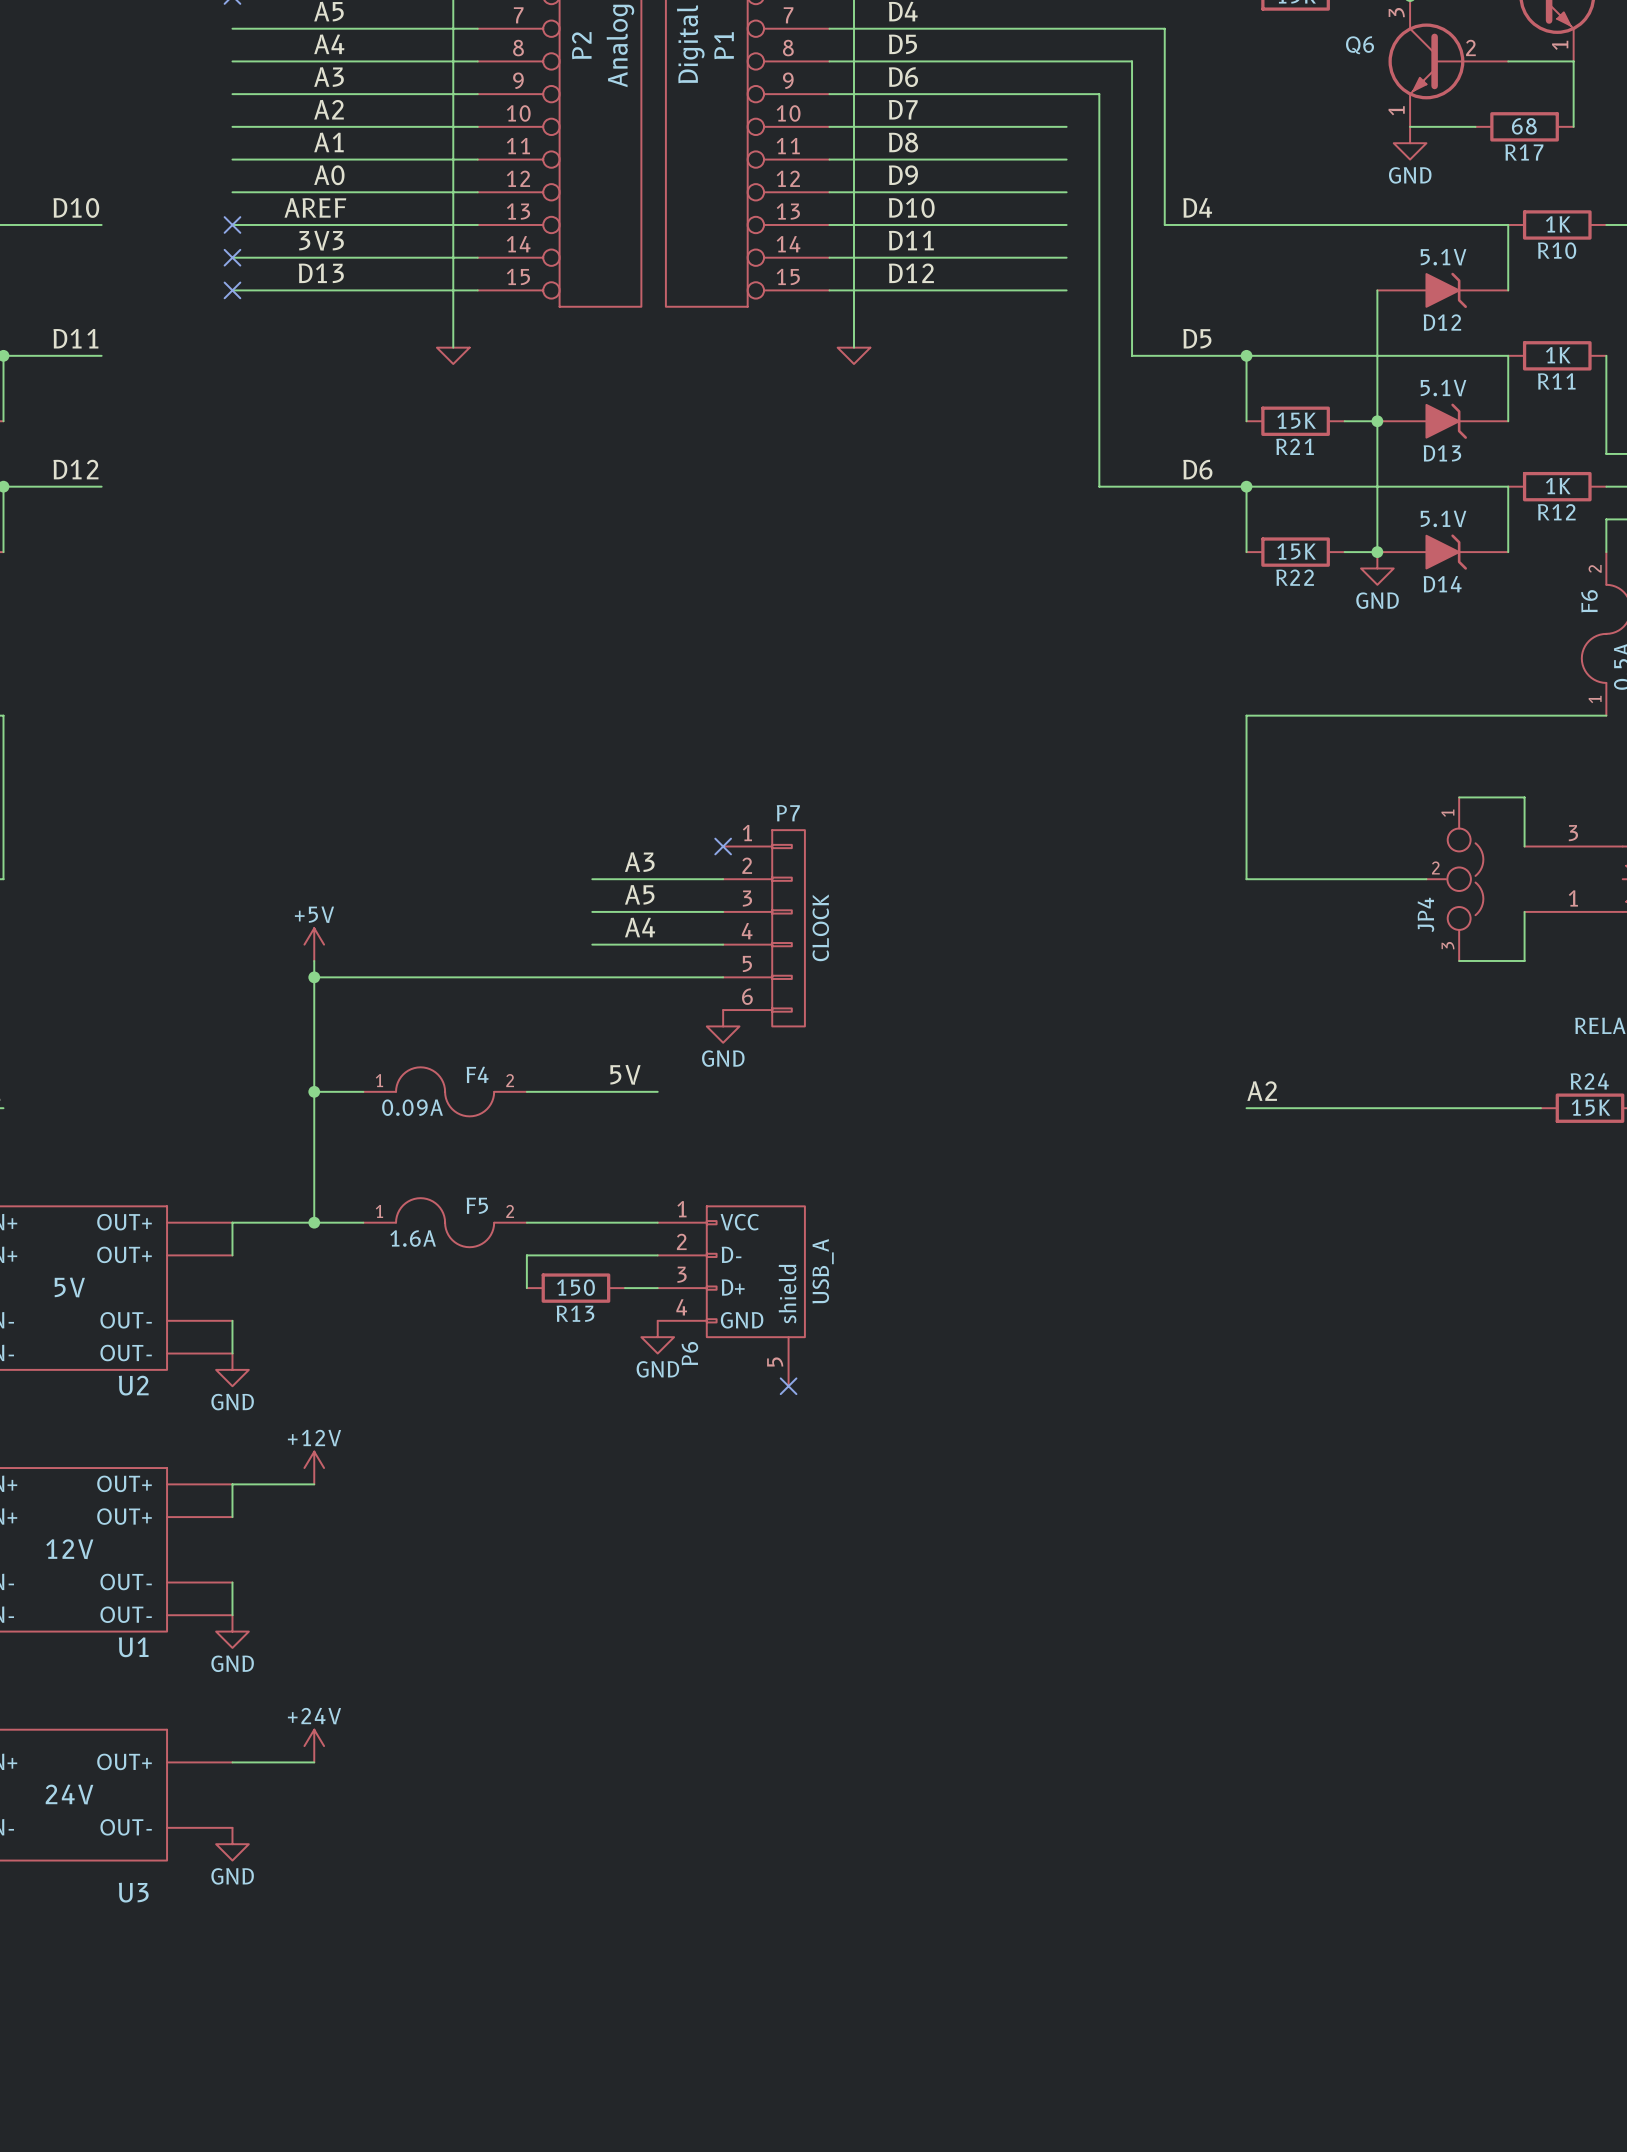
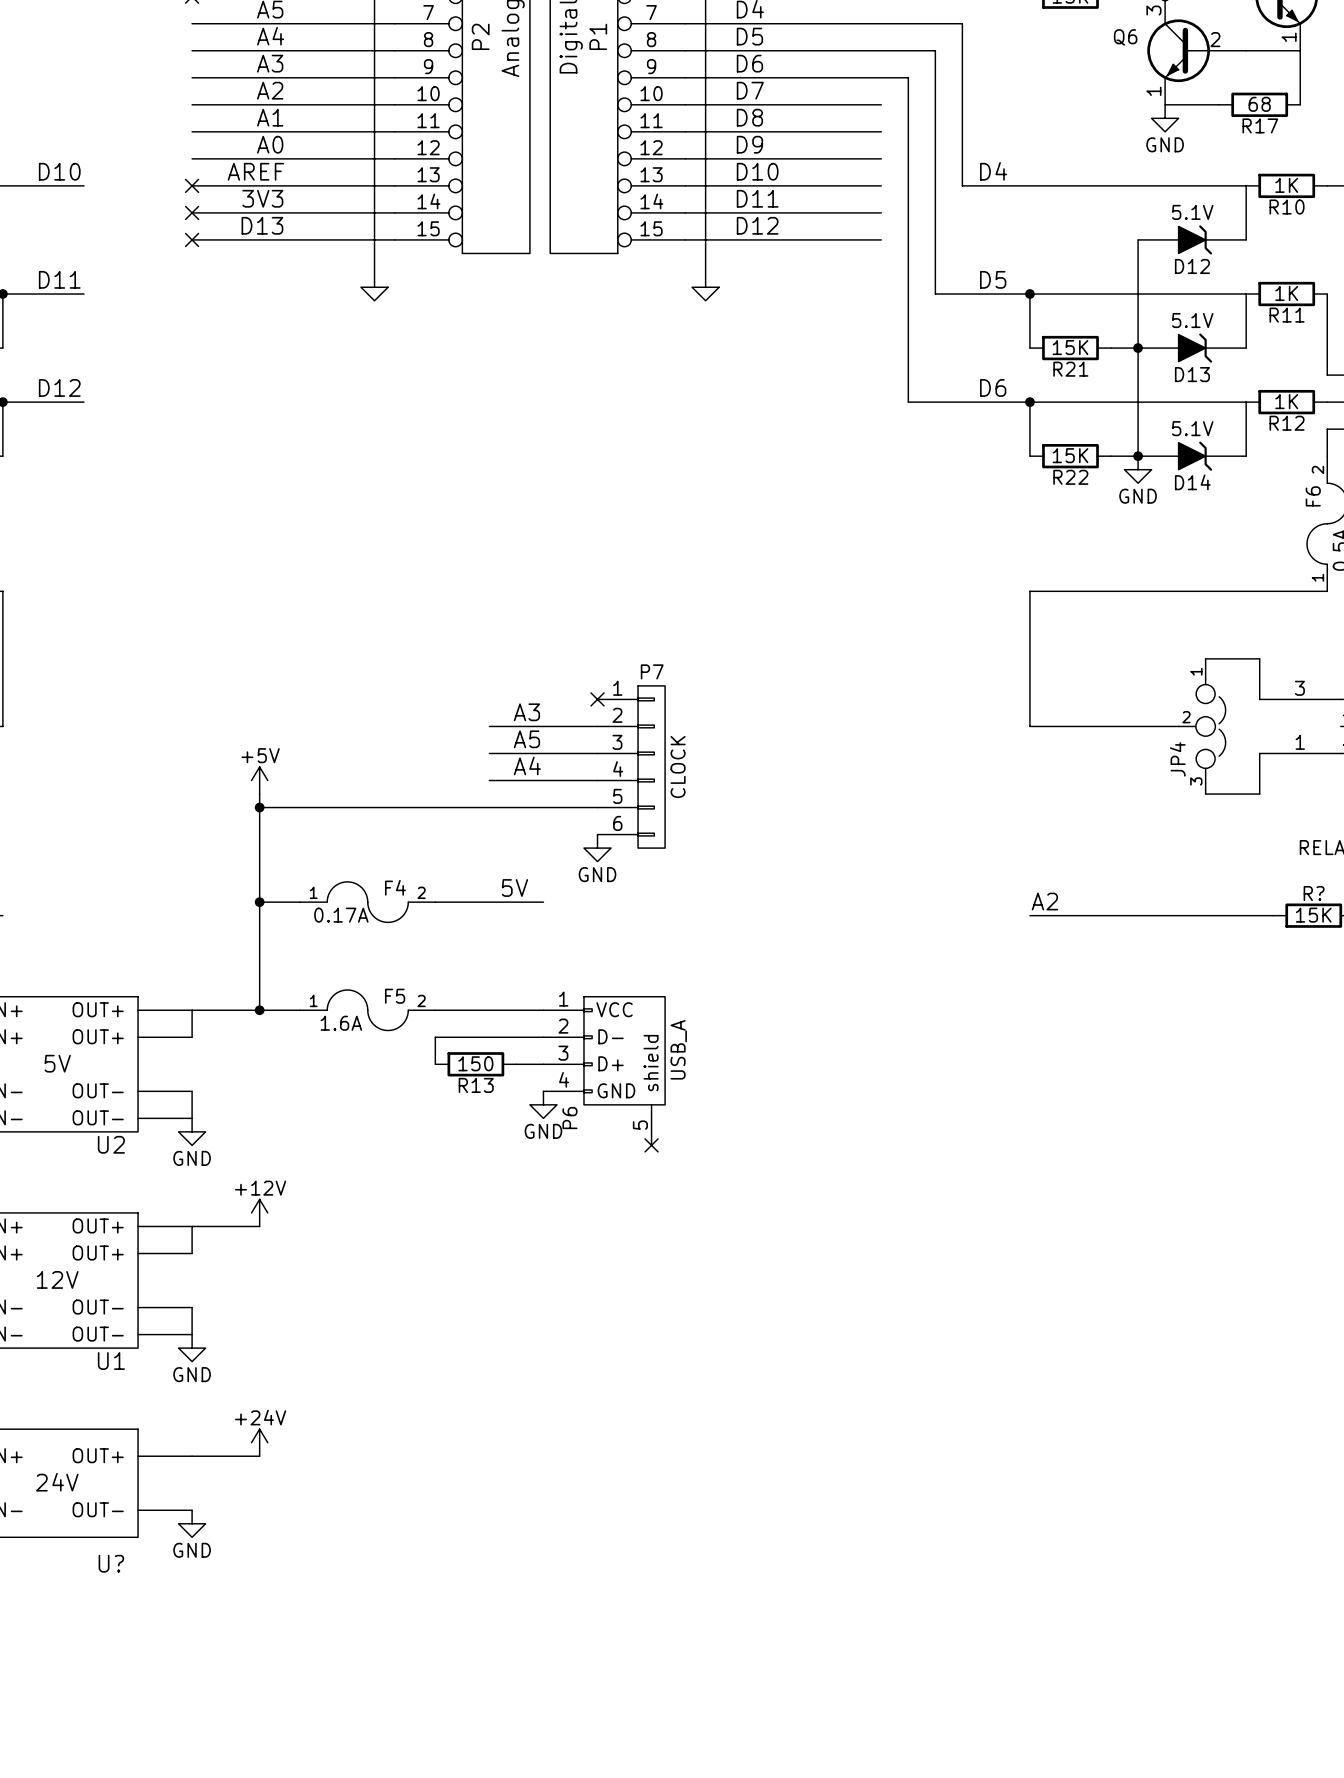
R24 name: R24 (1589, 1081) -> R? (1314, 893)
F4 value: 0.09A (412, 1107) -> 0.17A (341, 915)
U3 name: U3 (133, 1892) -> U? (111, 1563)

